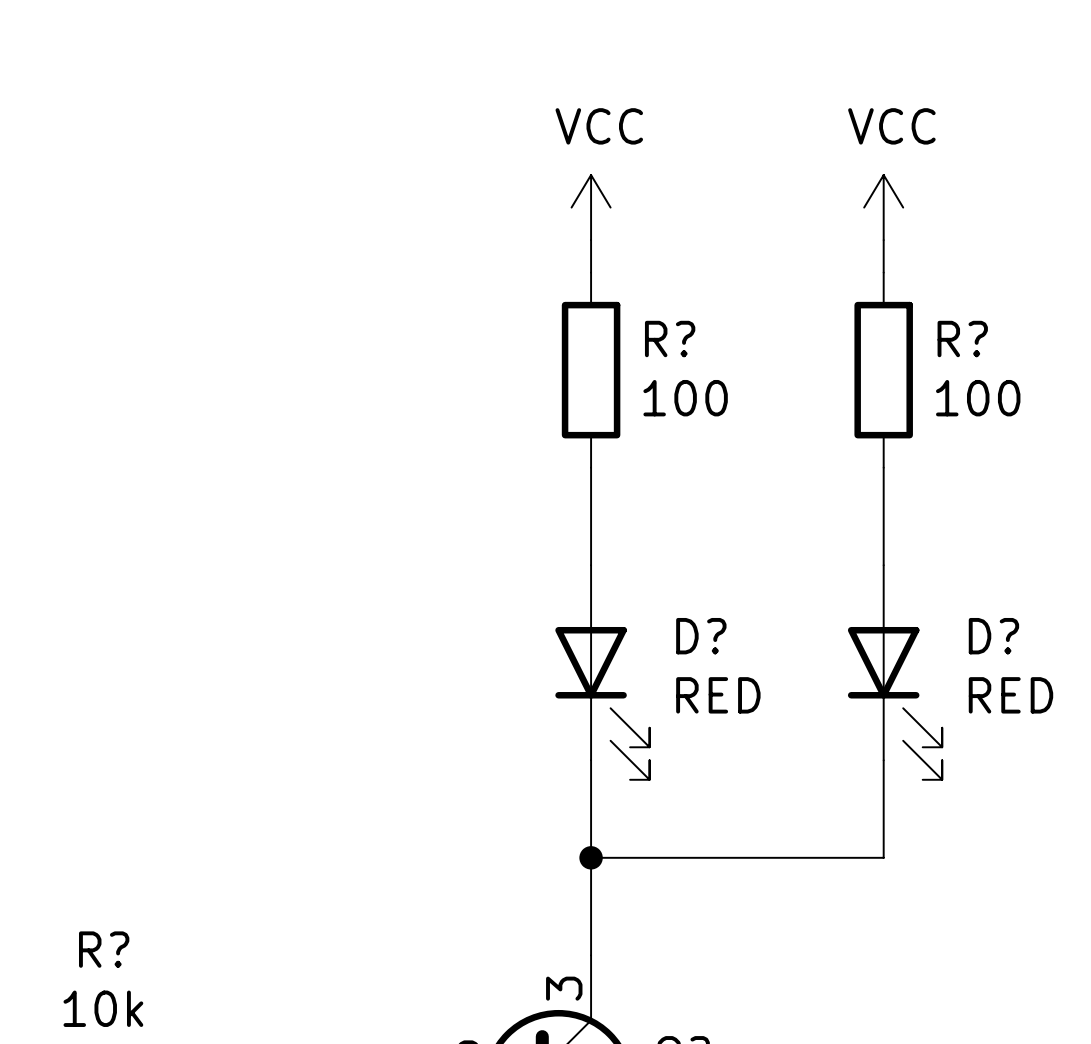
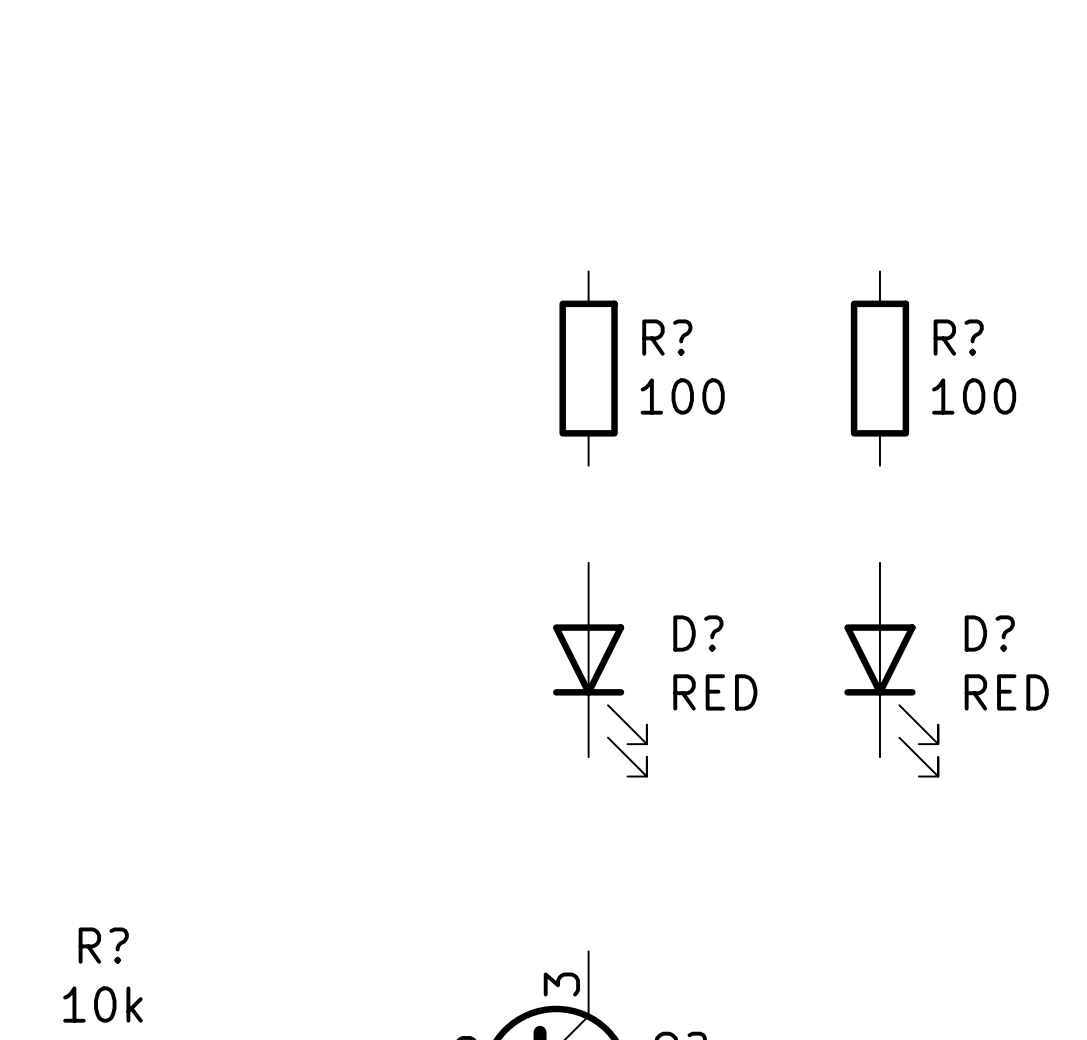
power symbol: VCC (591, 207) -> none
power symbol: VCC (883, 207) -> none
wire: (591, 240) (591, 272) -> none
wire: (883, 240) (883, 272) -> none
wire: (591, 467) (591, 565) -> none
wire: (883, 467) (883, 565) -> none
wire: (591, 760) (591, 955) -> none
wire: (883, 760) (883, 857) (591, 857) -> none
junction: (591, 857) -> none

